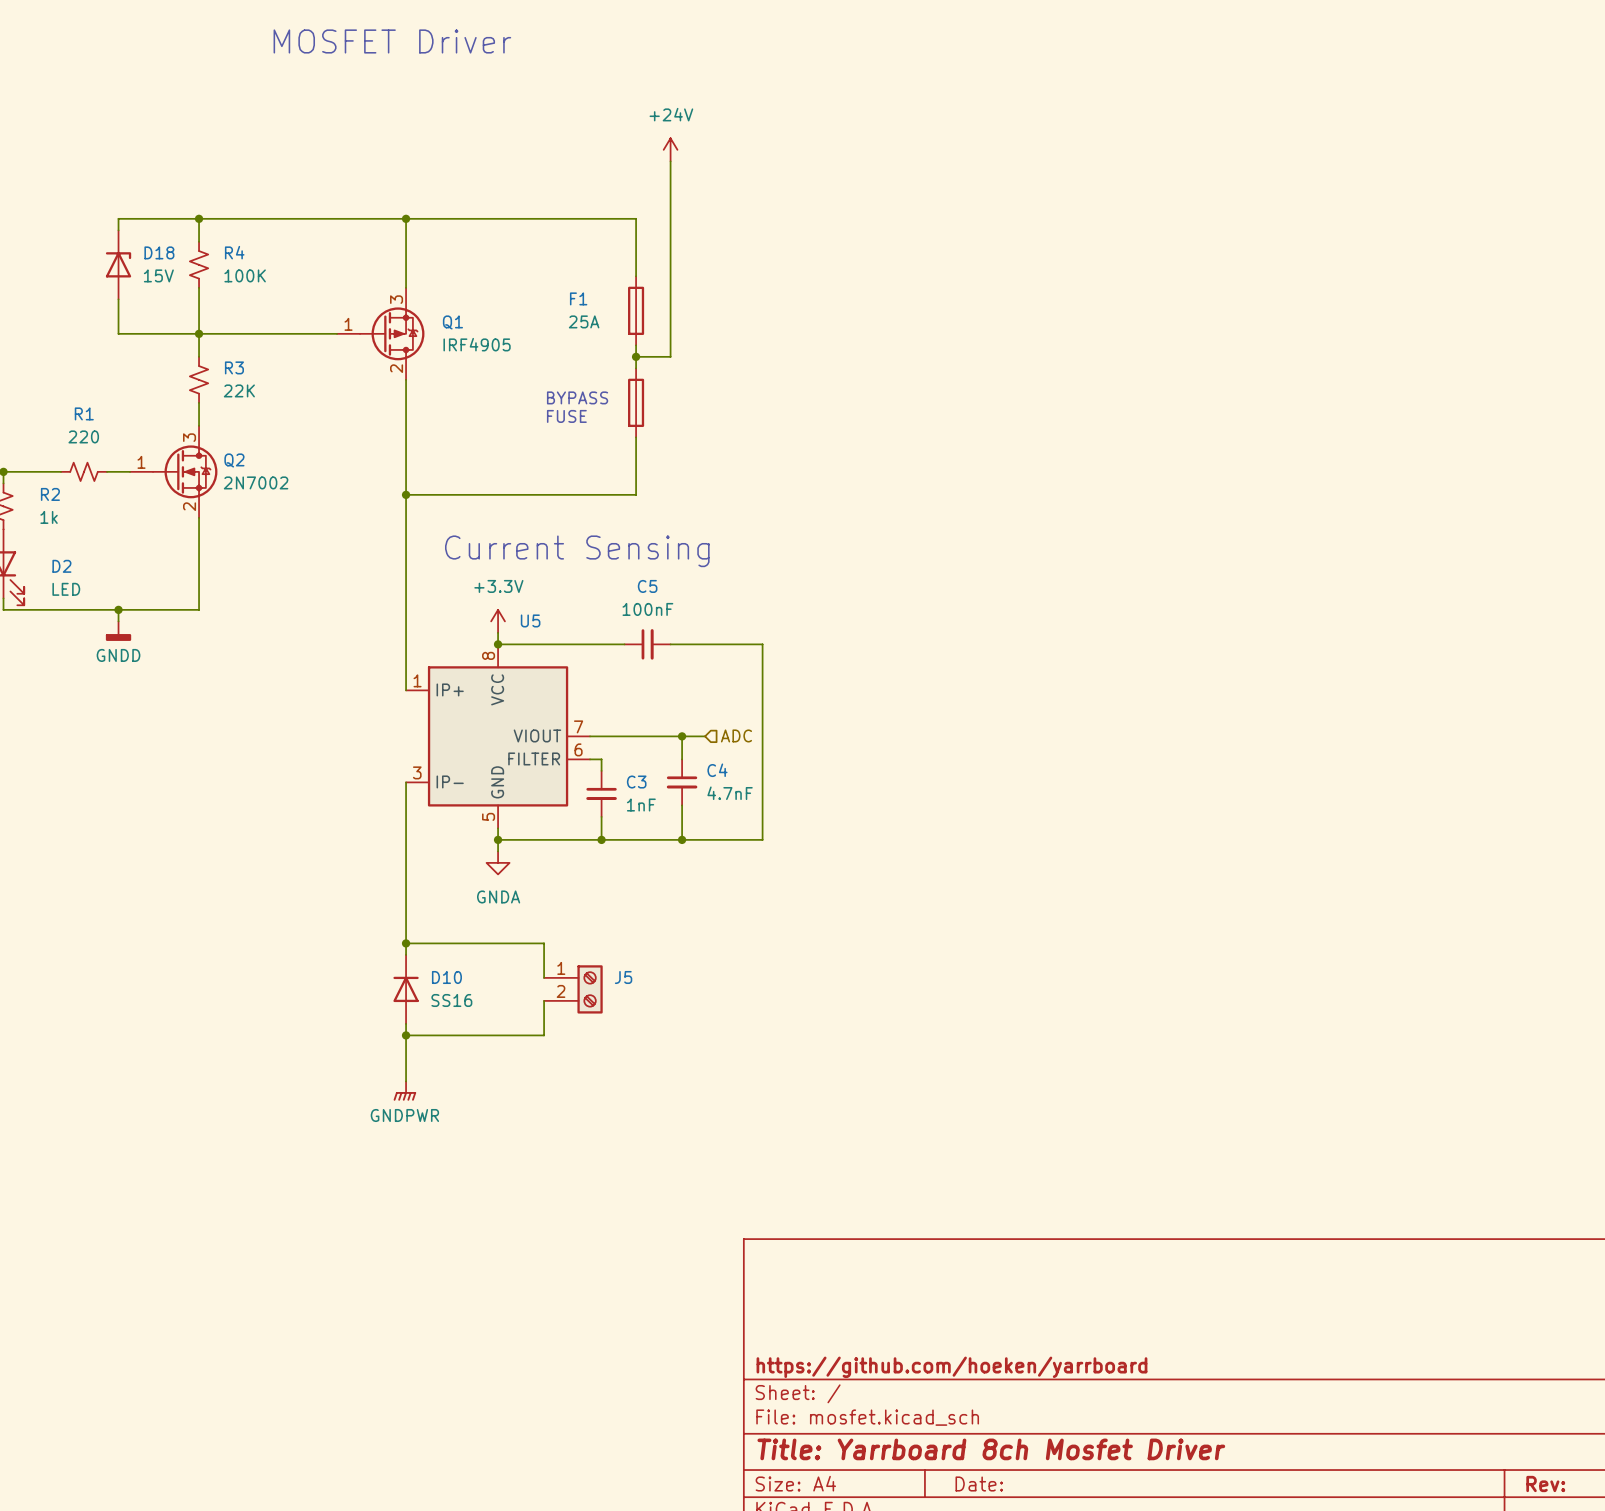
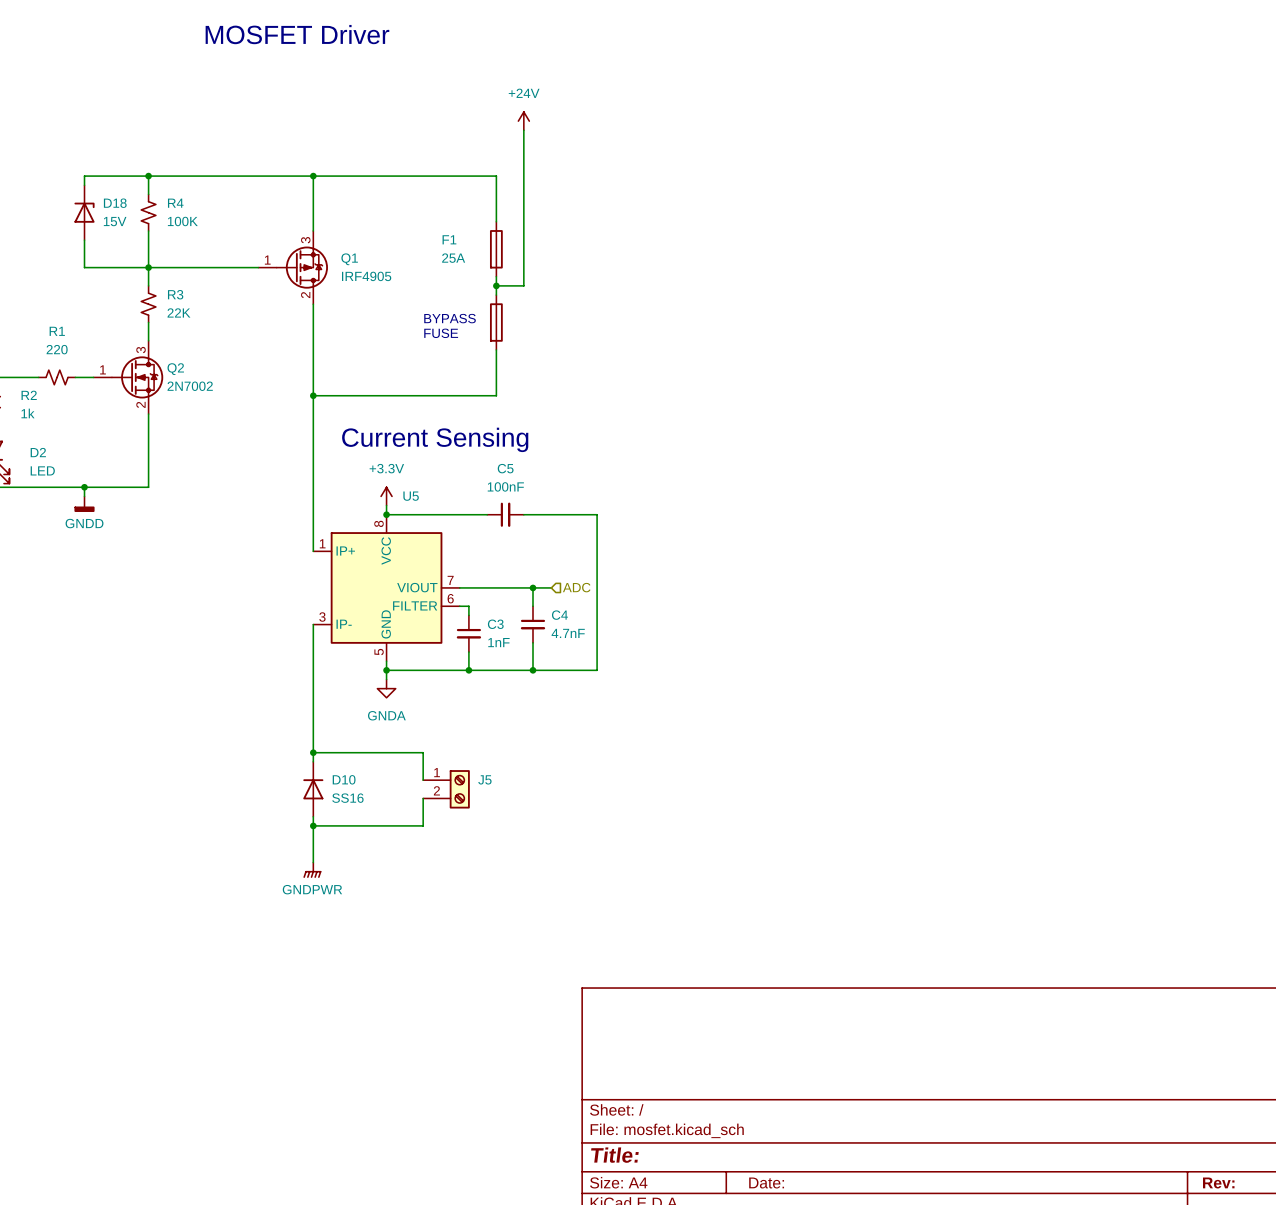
title block: https://github.com/hoeken/yarrboard (951, 1367) -> none
title block: Title: Yarrboard 8ch Mosfet Driver (991, 1449) -> Title: (614, 1155)

